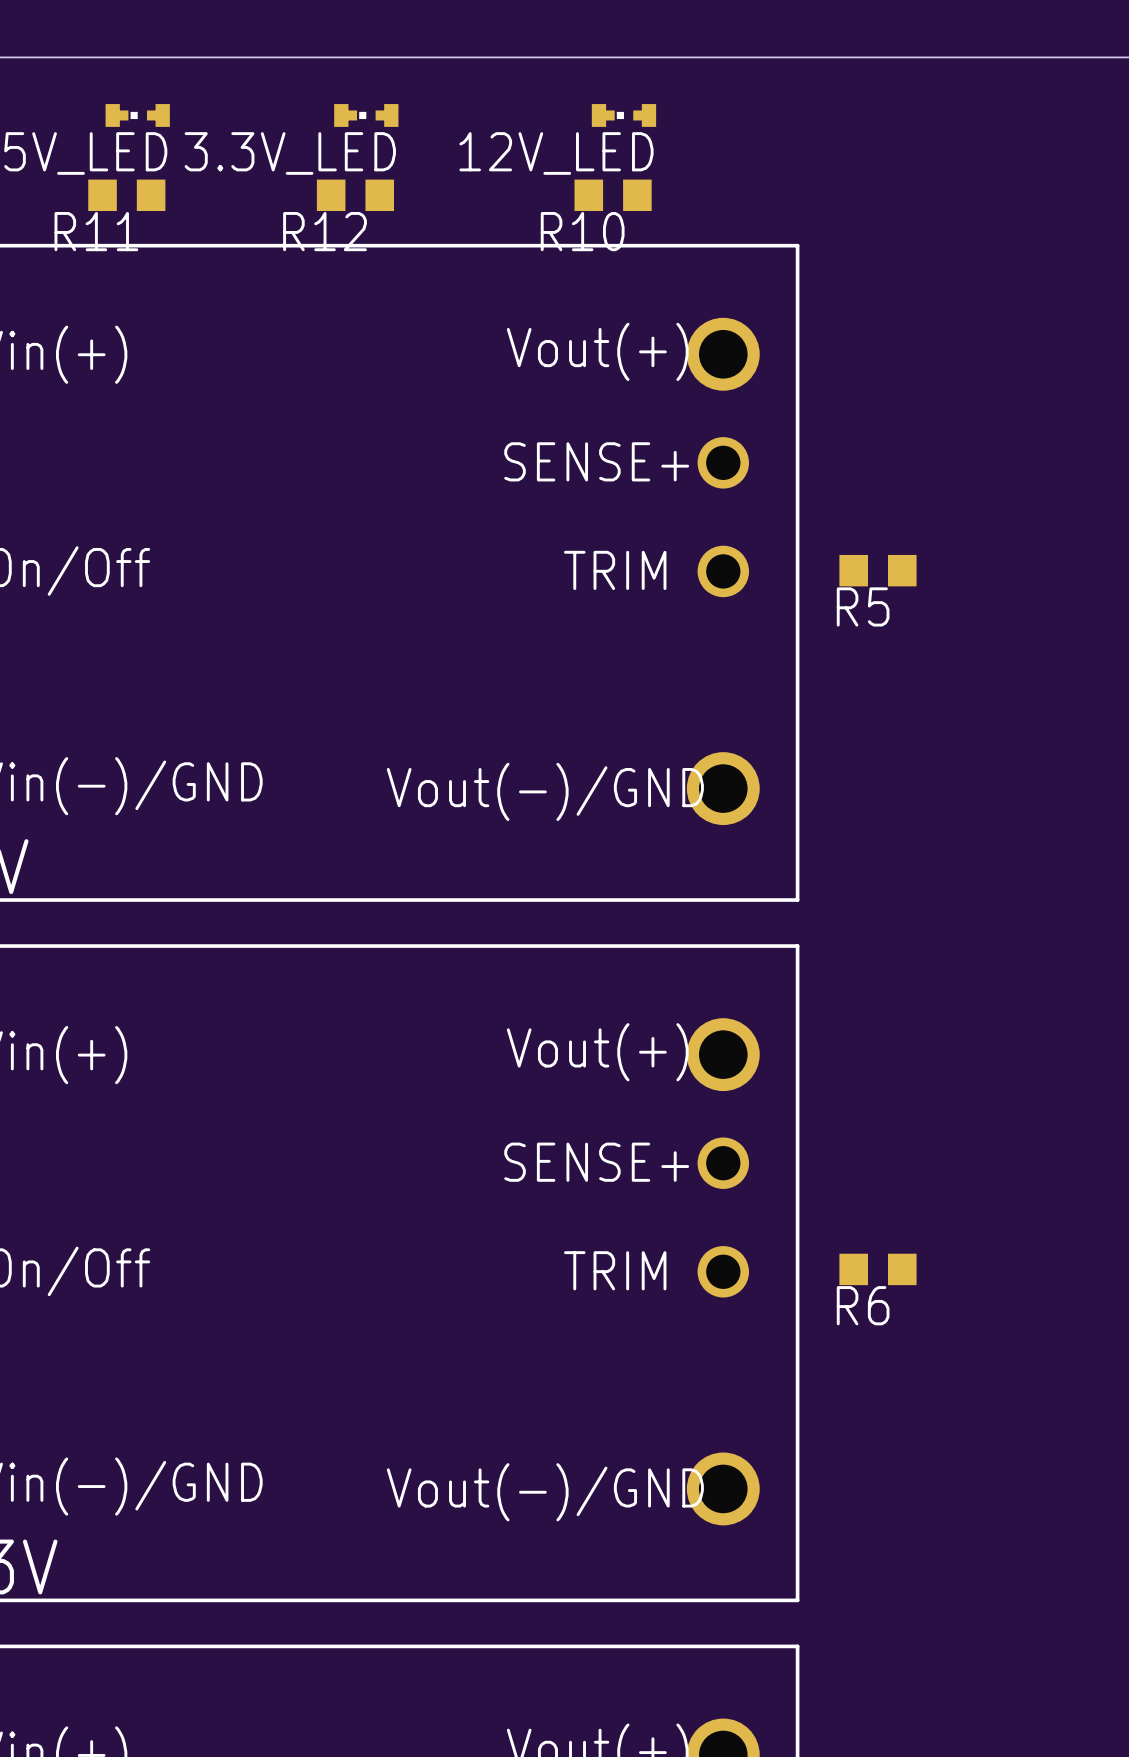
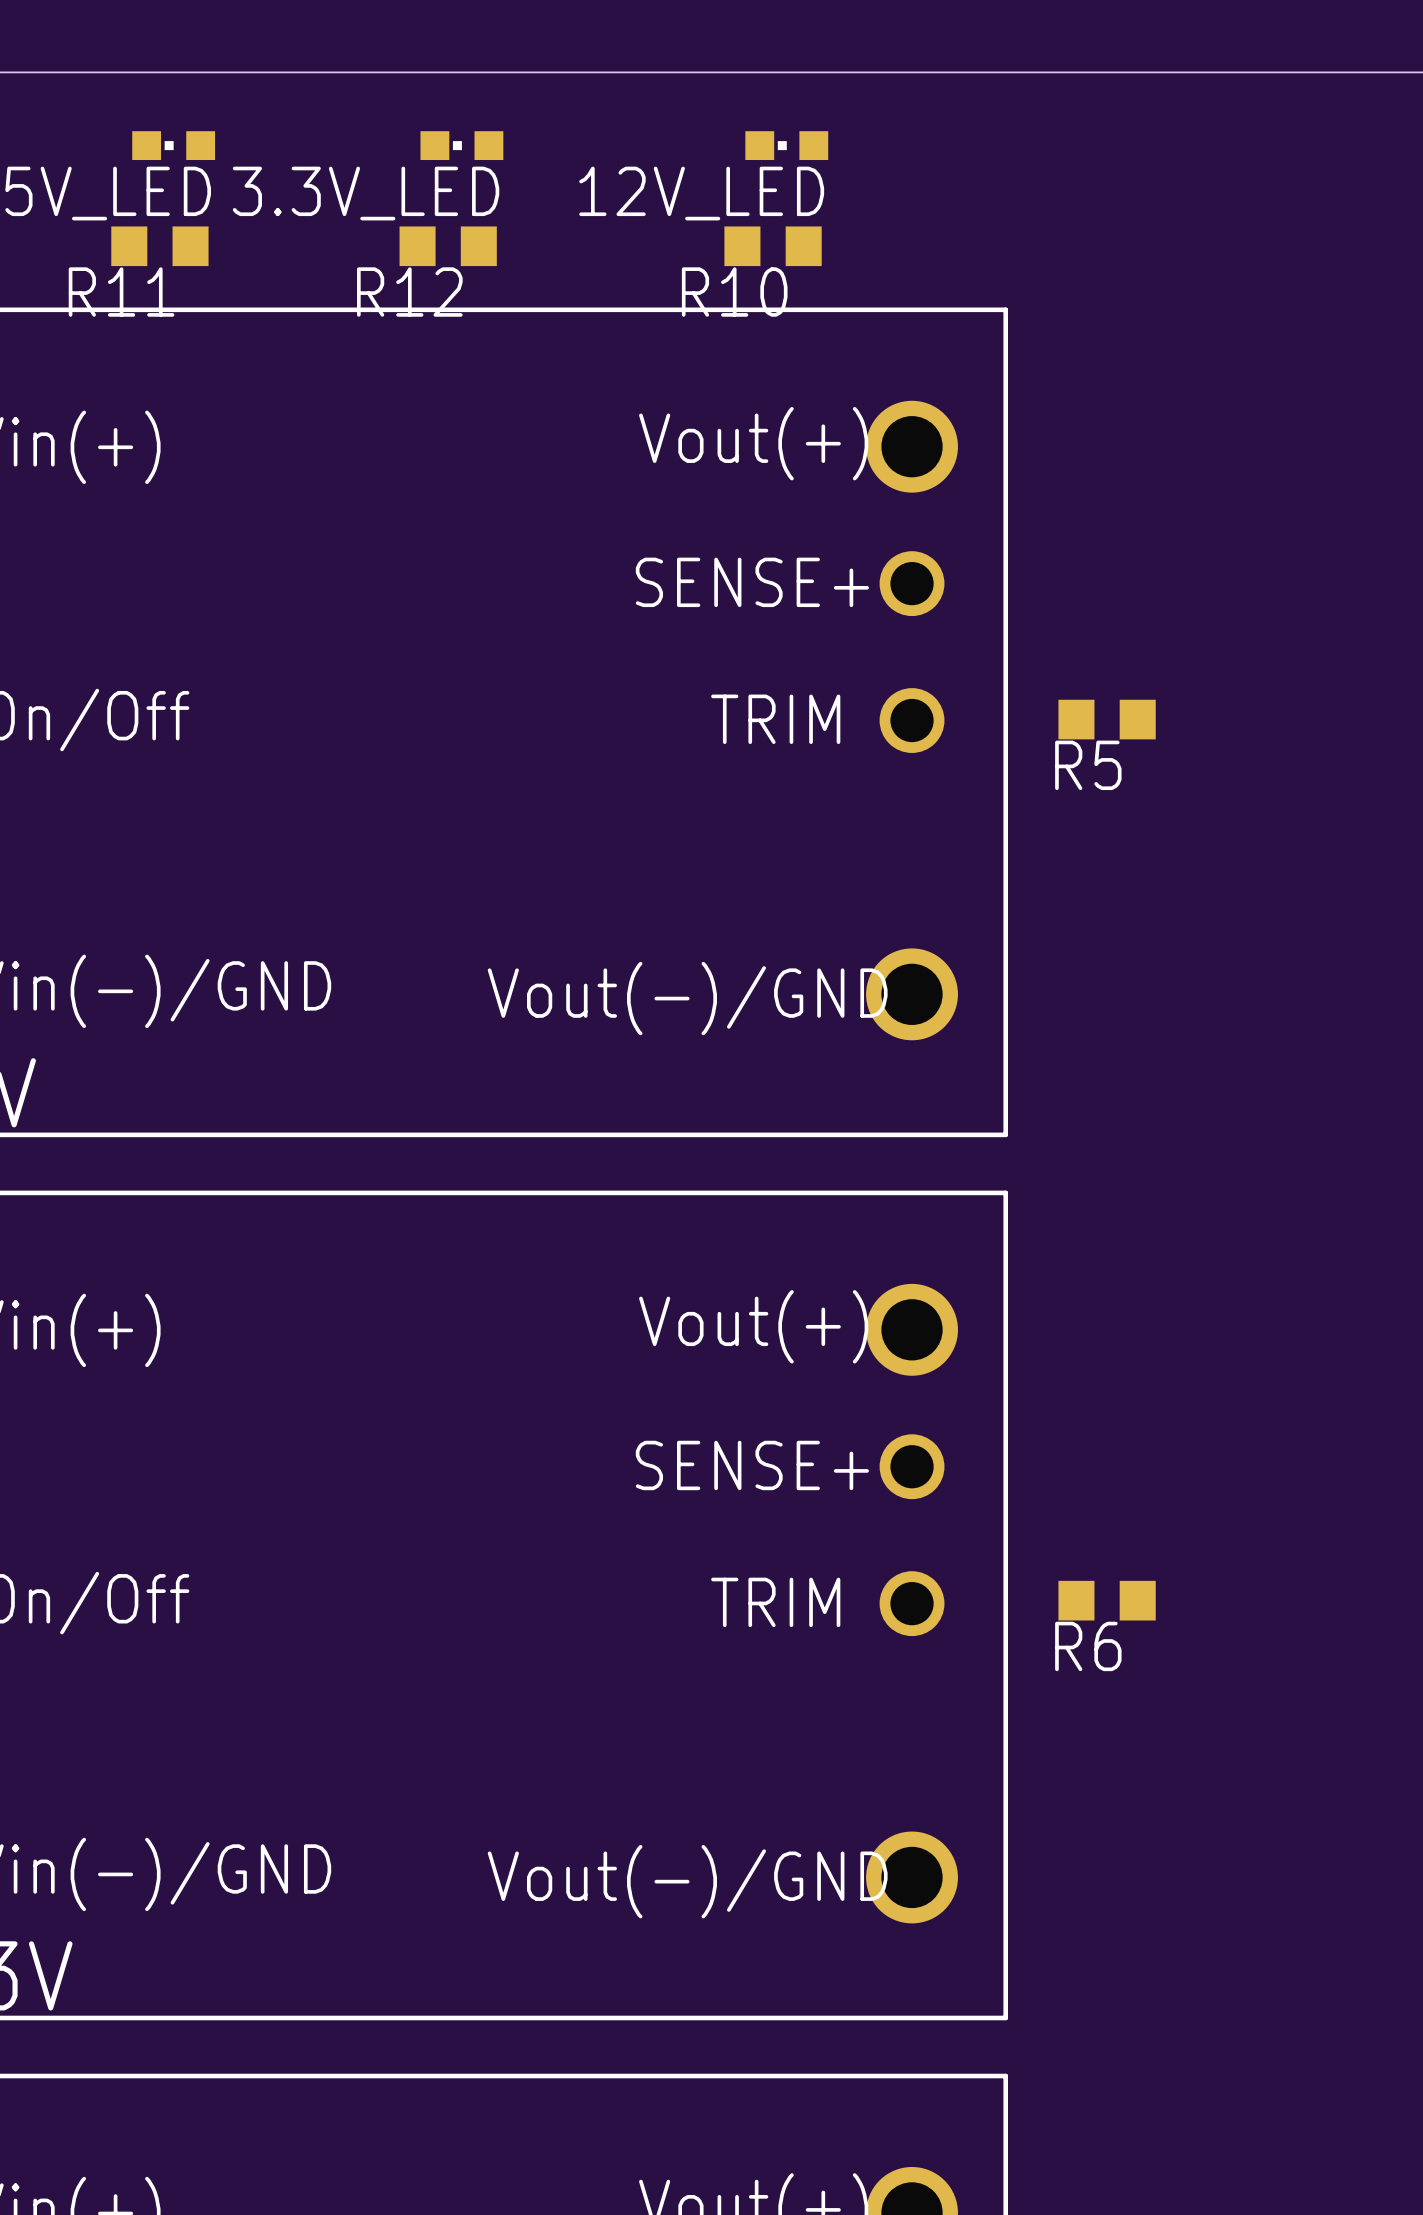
5V_LED footprint: [105, 104, 170, 127] -> [132, 131, 216, 161]
3.3V_LED footprint: [334, 104, 399, 127] -> [420, 131, 504, 161]
12V_LED footprint: [591, 104, 657, 127] -> [745, 131, 829, 161]

